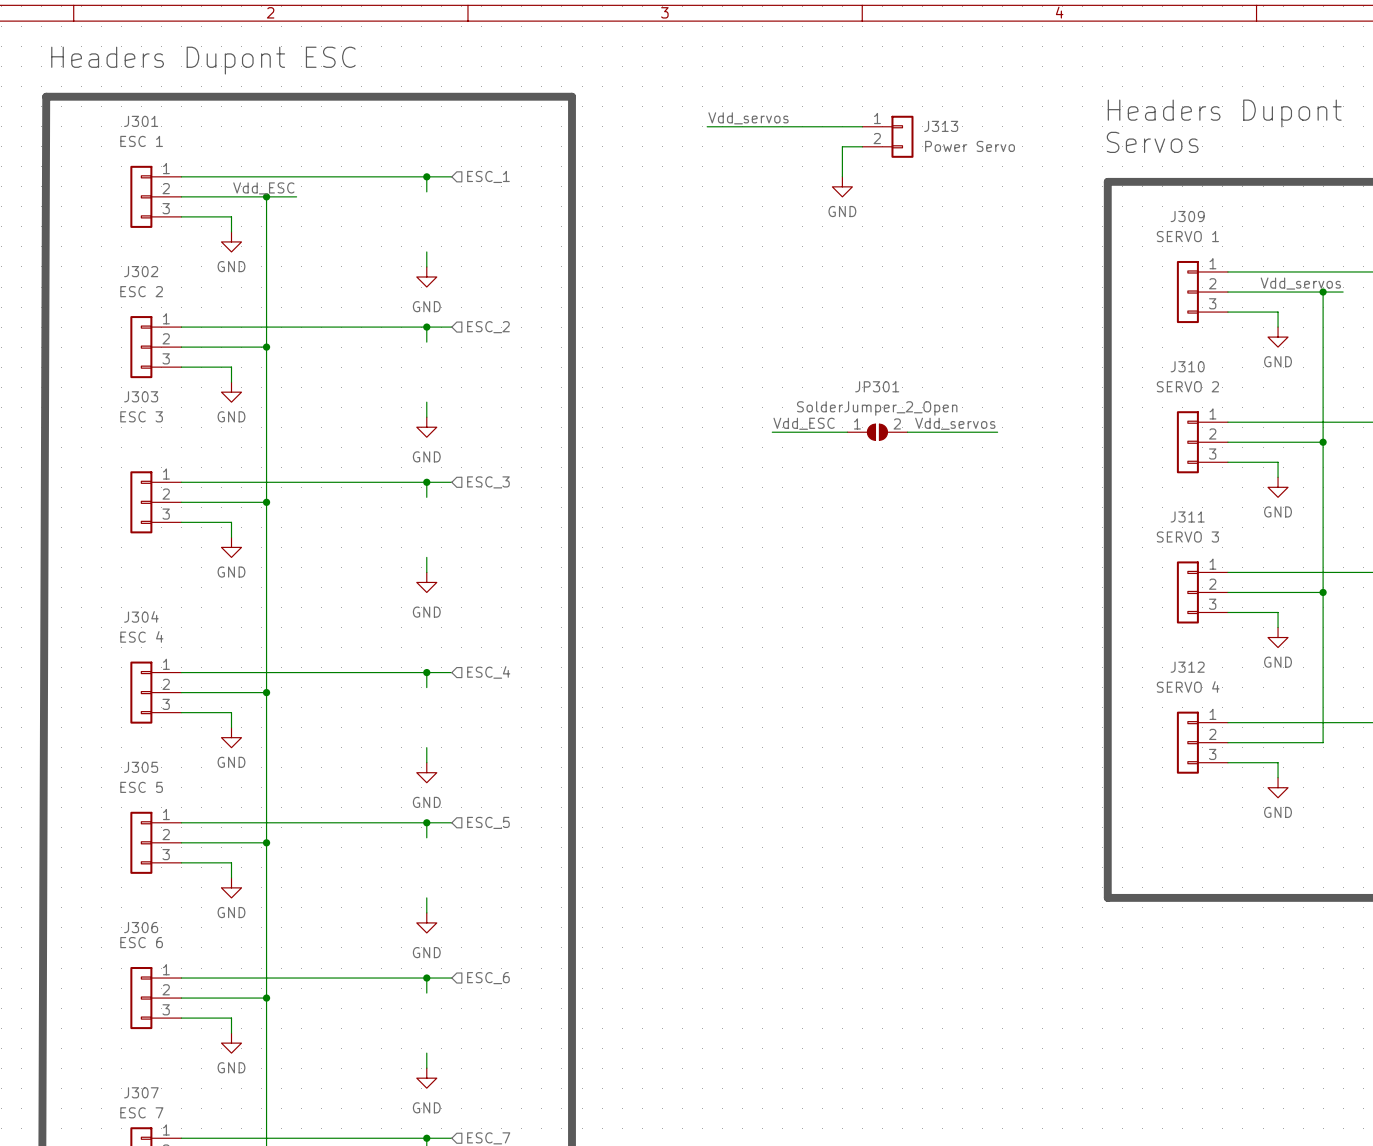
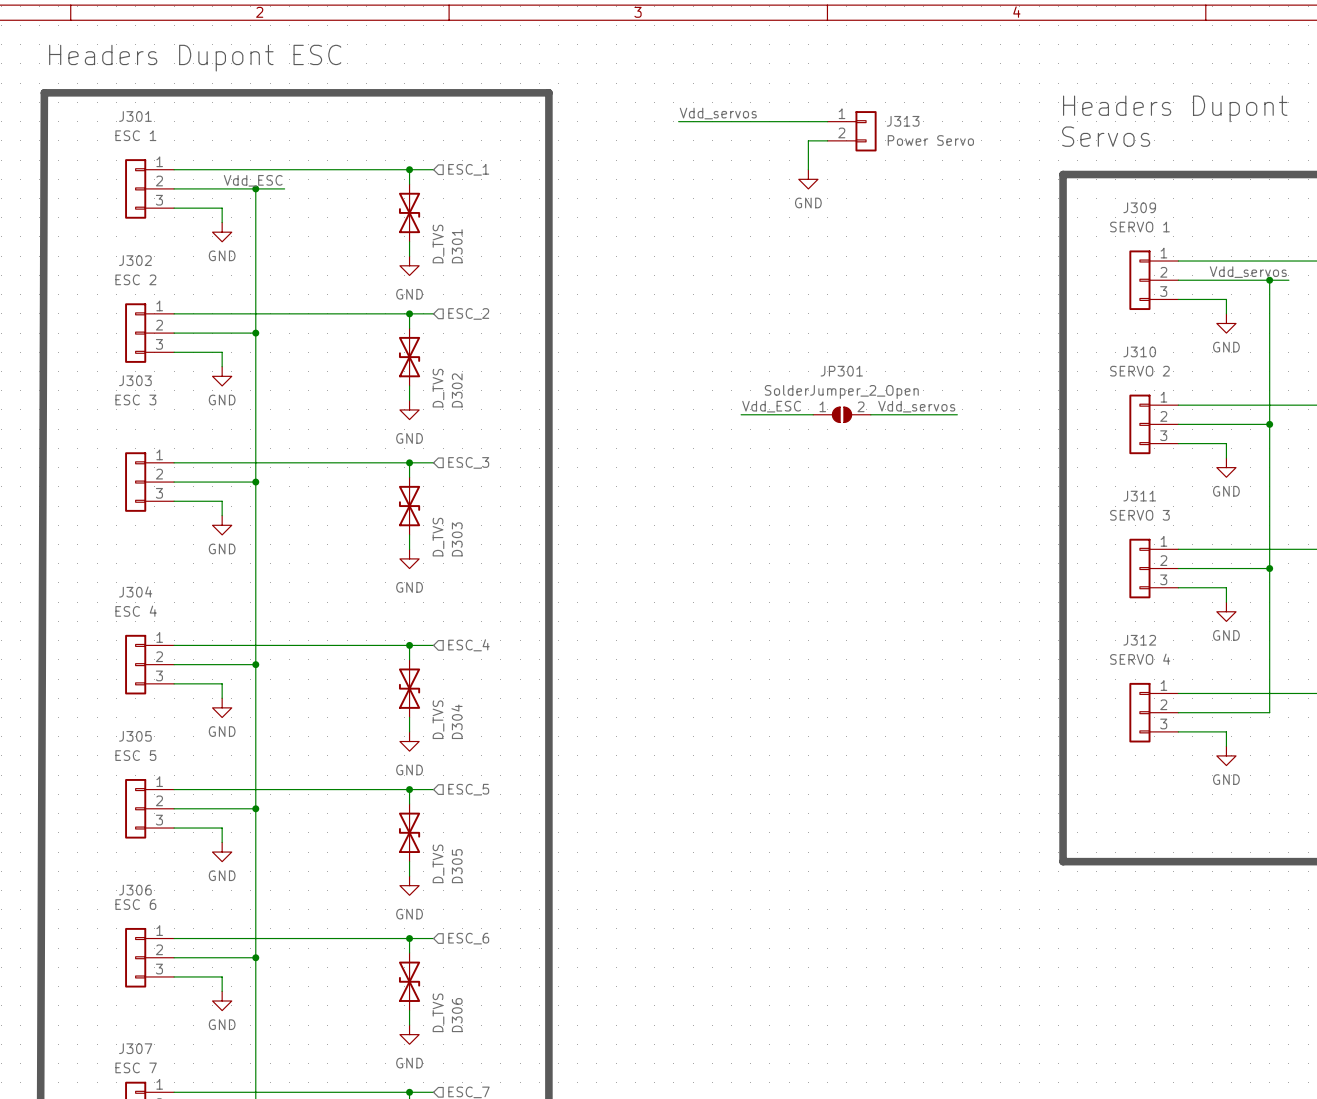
D301: none -> D_TVS (409, 212)
D302: none -> D_TVS (409, 357)
D303: none -> D_TVS (409, 506)
D304: none -> D_TVS (409, 688)
D305: none -> D_TVS (409, 832)
D306: none -> D_TVS (409, 981)

